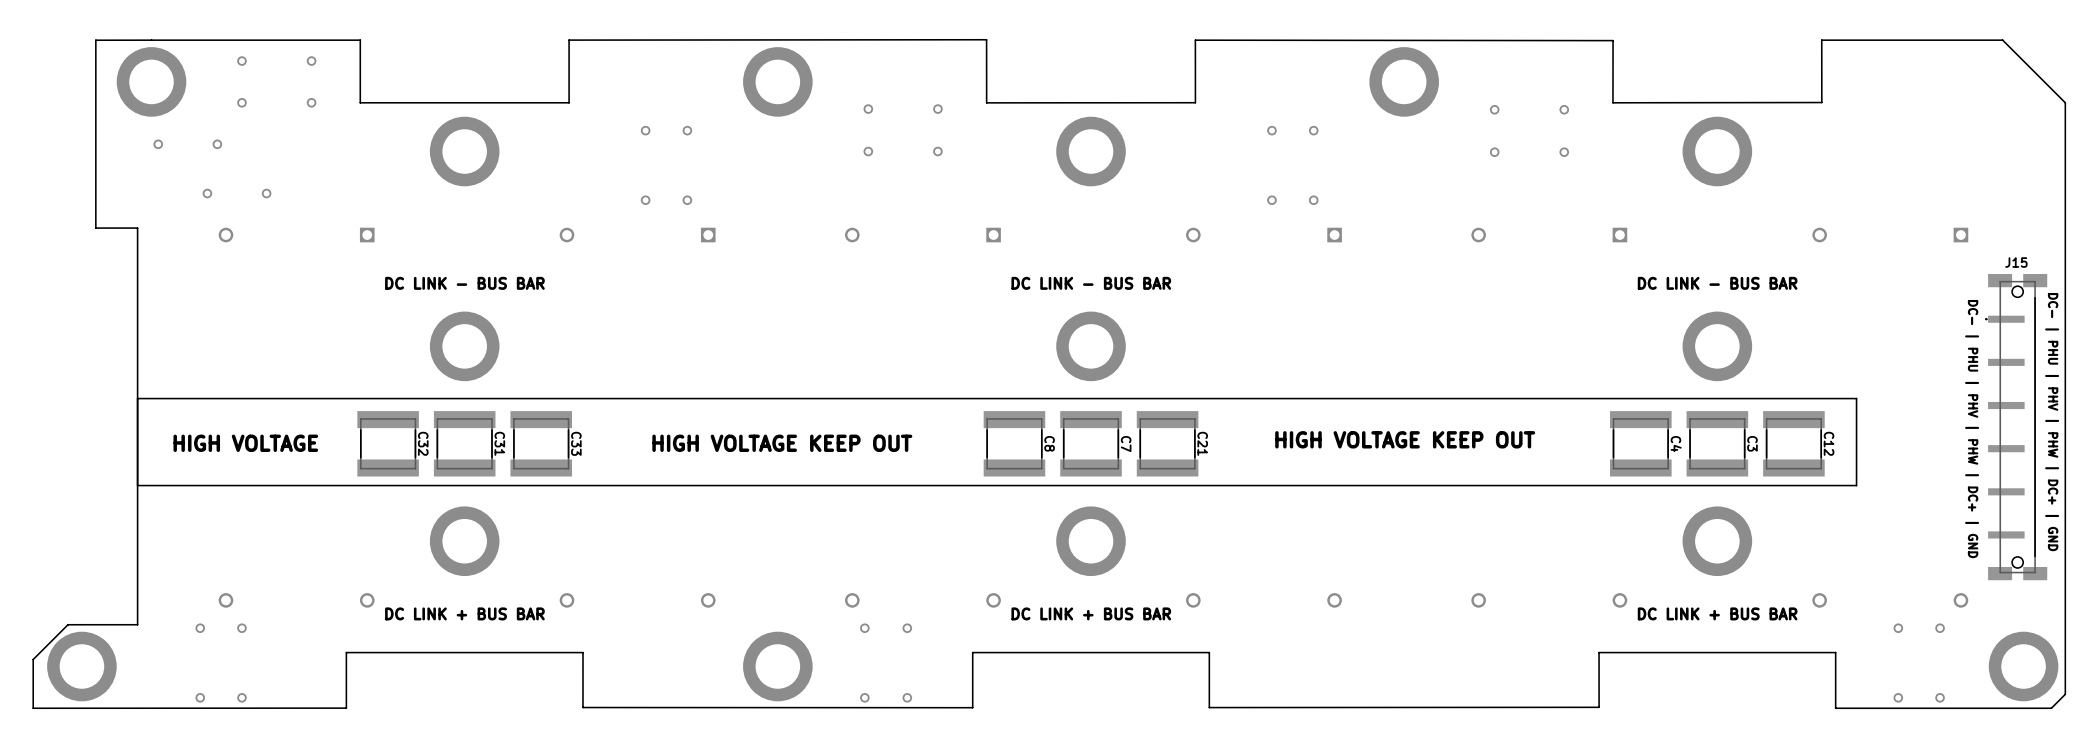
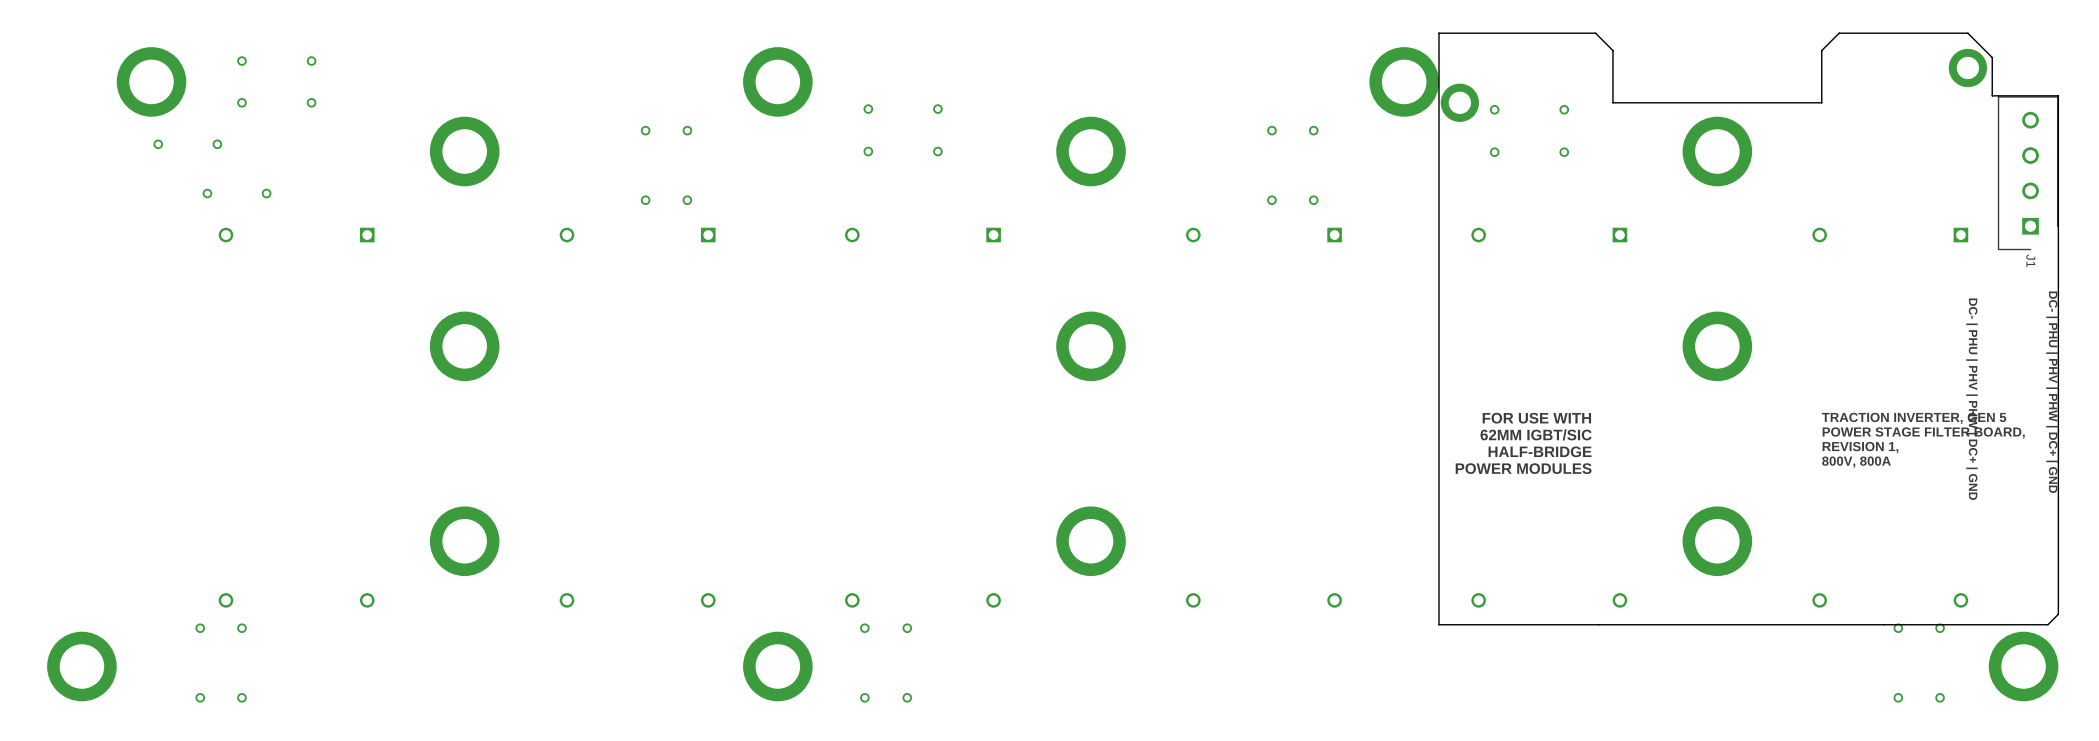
board edge: none -> (1967, 33) (1839, 33) (1821, 50) (1821, 102) (1612, 102) (1612, 50) (1595, 33) (1438, 33) (1438, 624) (2047, 624) (2058, 614) (2058, 95) (1992, 95) (1992, 57) (1967, 33)
board edge: (986, 39) (569, 40) (569, 102) (360, 102) (360, 40) (95, 40) (95, 228) (137, 228) (137, 624) (68, 624) (33, 659) (33, 708) (346, 708) (346, 652) (583, 652) (582, 707) (972, 707) (972, 652) (1209, 652) (1209, 707) (1599, 707) (1599, 652) (1835, 652) (1835, 708) (2051, 708) (2065, 694) (2065, 102) (2002, 40) (1821, 40) (1821, 102) (1612, 102) (1613, 40) (1195, 40) (1195, 102) (986, 102) (986, 39) -> none
part: none -> (1967, 68)
part: none -> (1459, 102)
J1: none -> (2028, 173)
text: DC LINK - BUS BAR (464, 283) -> none
text: DC LINK - BUS BAR (1091, 283) -> none
text: DC LINK - BUS BAR (1717, 283) -> none
line: (1856, 398) (137, 398) (137, 485) (1856, 485) (1856, 398) -> none
text: none -> FOR USE WITH (1536, 418)
text: none -> TRACTION INVERTER, GEN 5 (1914, 418)
J15: (2016, 427) -> none
text: none -> POWER STAGE FILTER BOARD, (1923, 432)
text: none -> 62MM IGBT/SIC (1536, 434)
text: HIGH VOLTAGE KEEP OUT (1405, 439) -> none
text: HIGH VOLTAGE (245, 443) -> none
C32: (388, 443) -> none
C31: (464, 443) -> none
C33: (541, 443) -> none
text: HIGH VOLTAGE KEEP OUT (782, 443) -> none
C8: (1014, 443) -> none
C7: (1091, 443) -> none
C21: (1167, 443) -> none
C4: (1640, 443) -> none
C3: (1717, 443) -> none
C12: (1793, 443) -> none
text: none -> REVISION 1, (1860, 447)
text: none -> HALF-BRIDGE (1540, 451)
text: none -> 800V, 800A (1856, 462)
text: none -> POWER MODULES (1523, 468)
text: DC LINK + BUS BAR (464, 613) -> none
text: DC LINK + BUS BAR (1091, 613) -> none
text: DC LINK + BUS BAR (1717, 613) -> none

